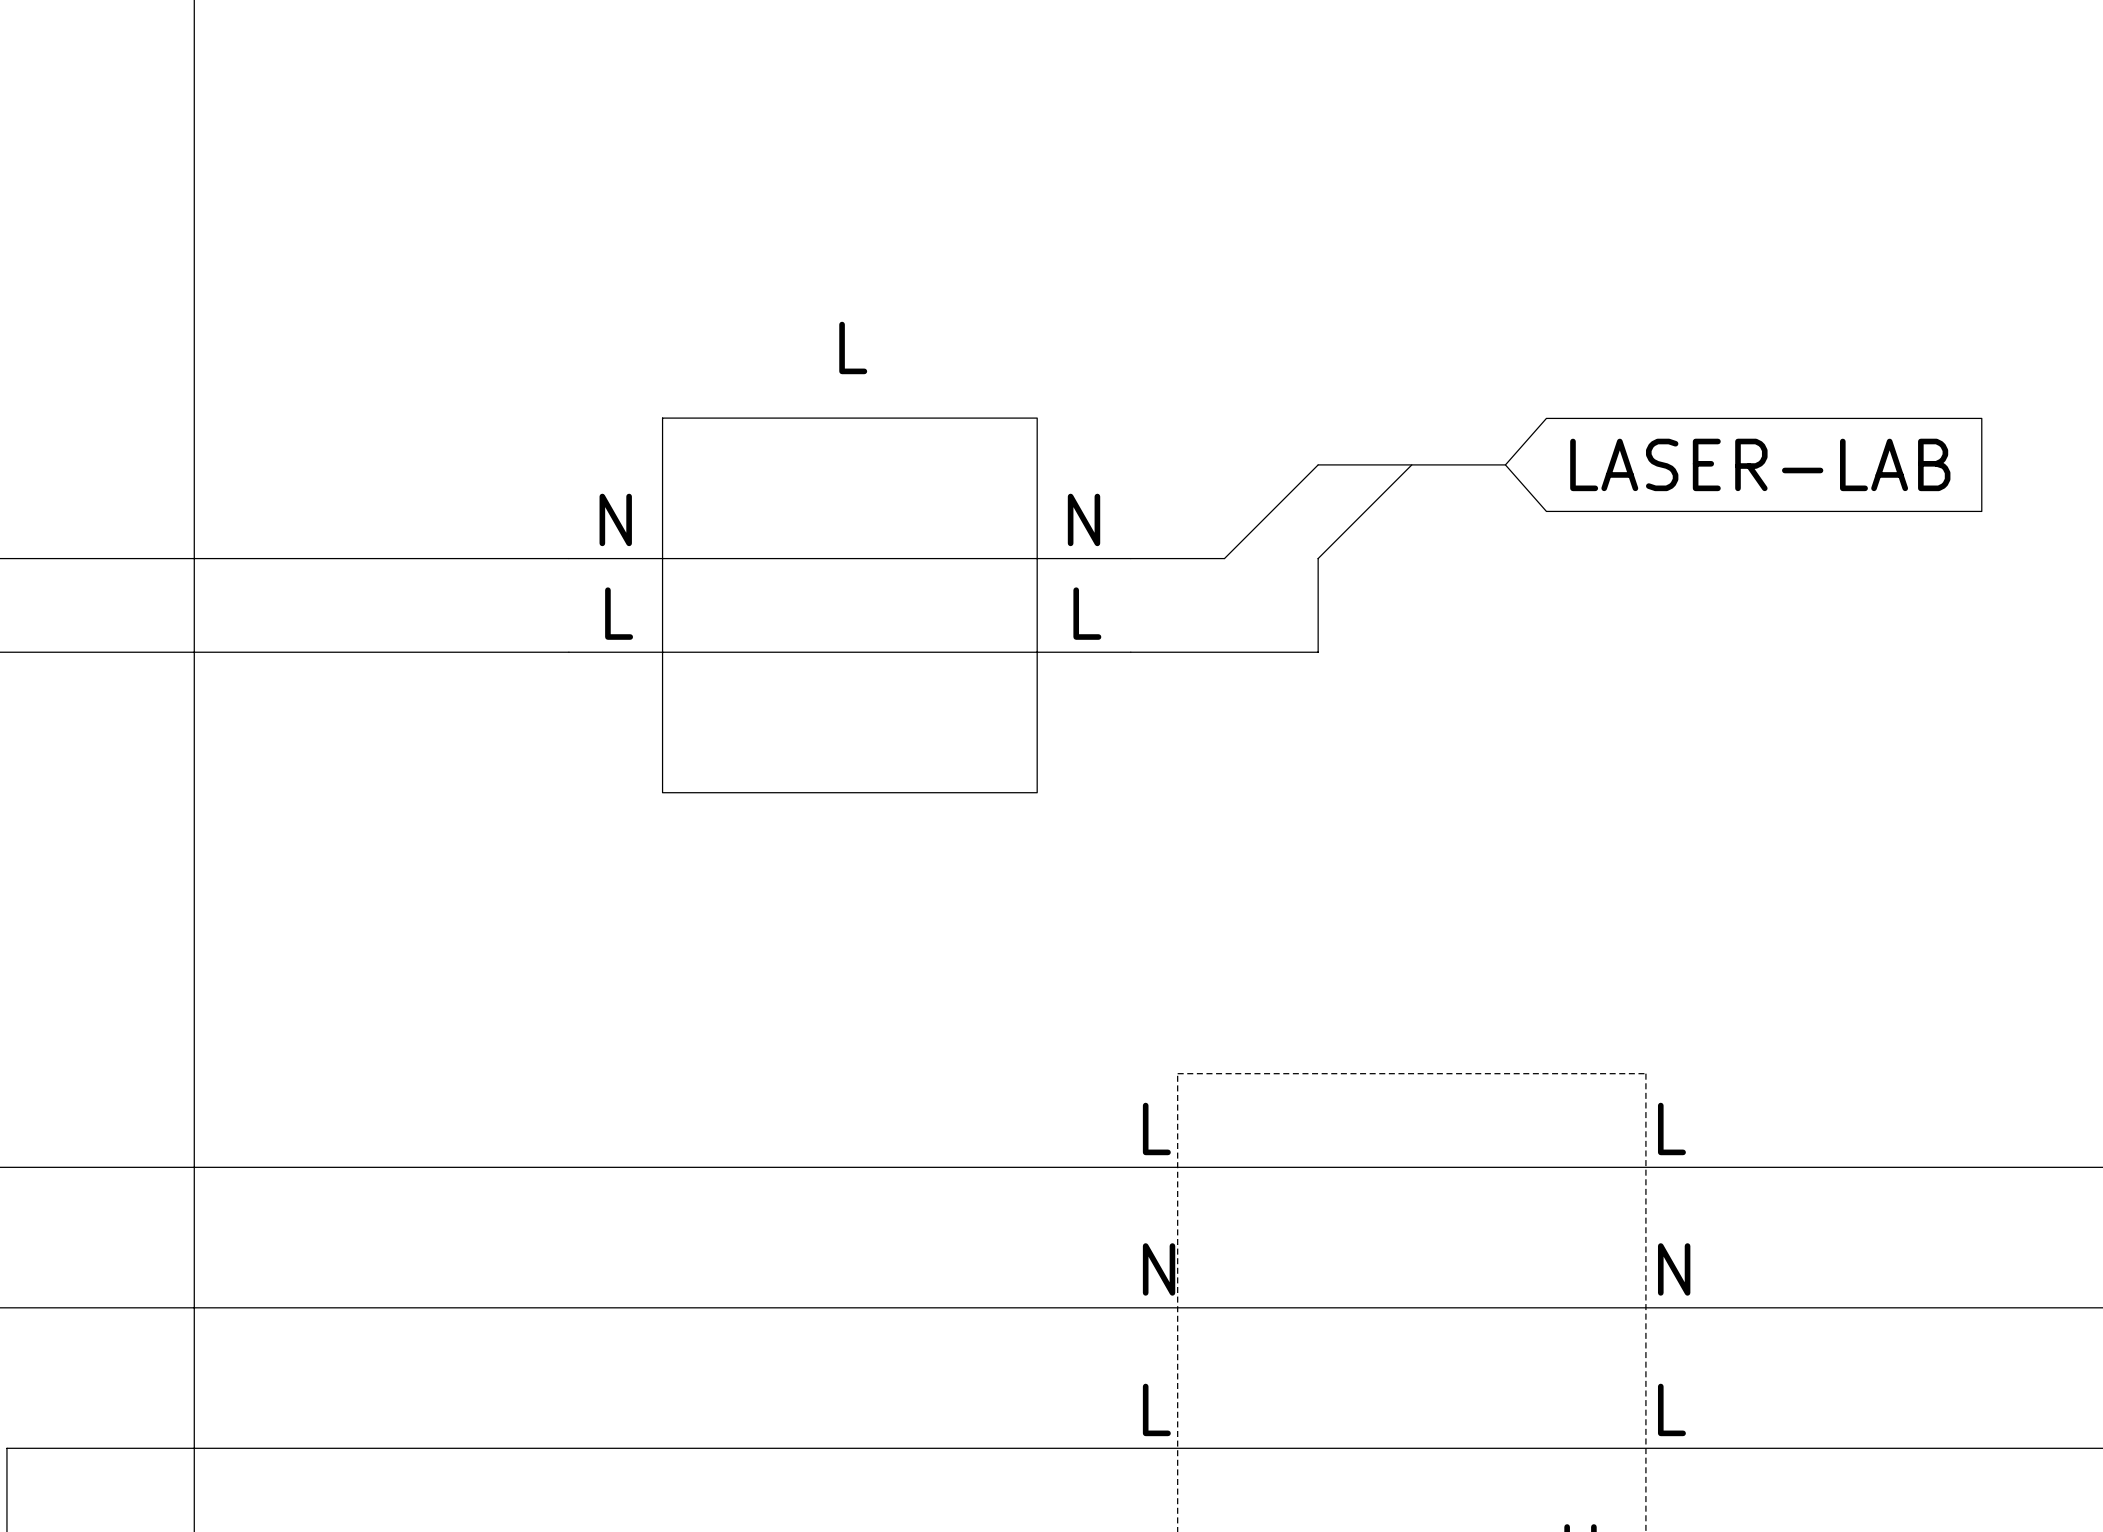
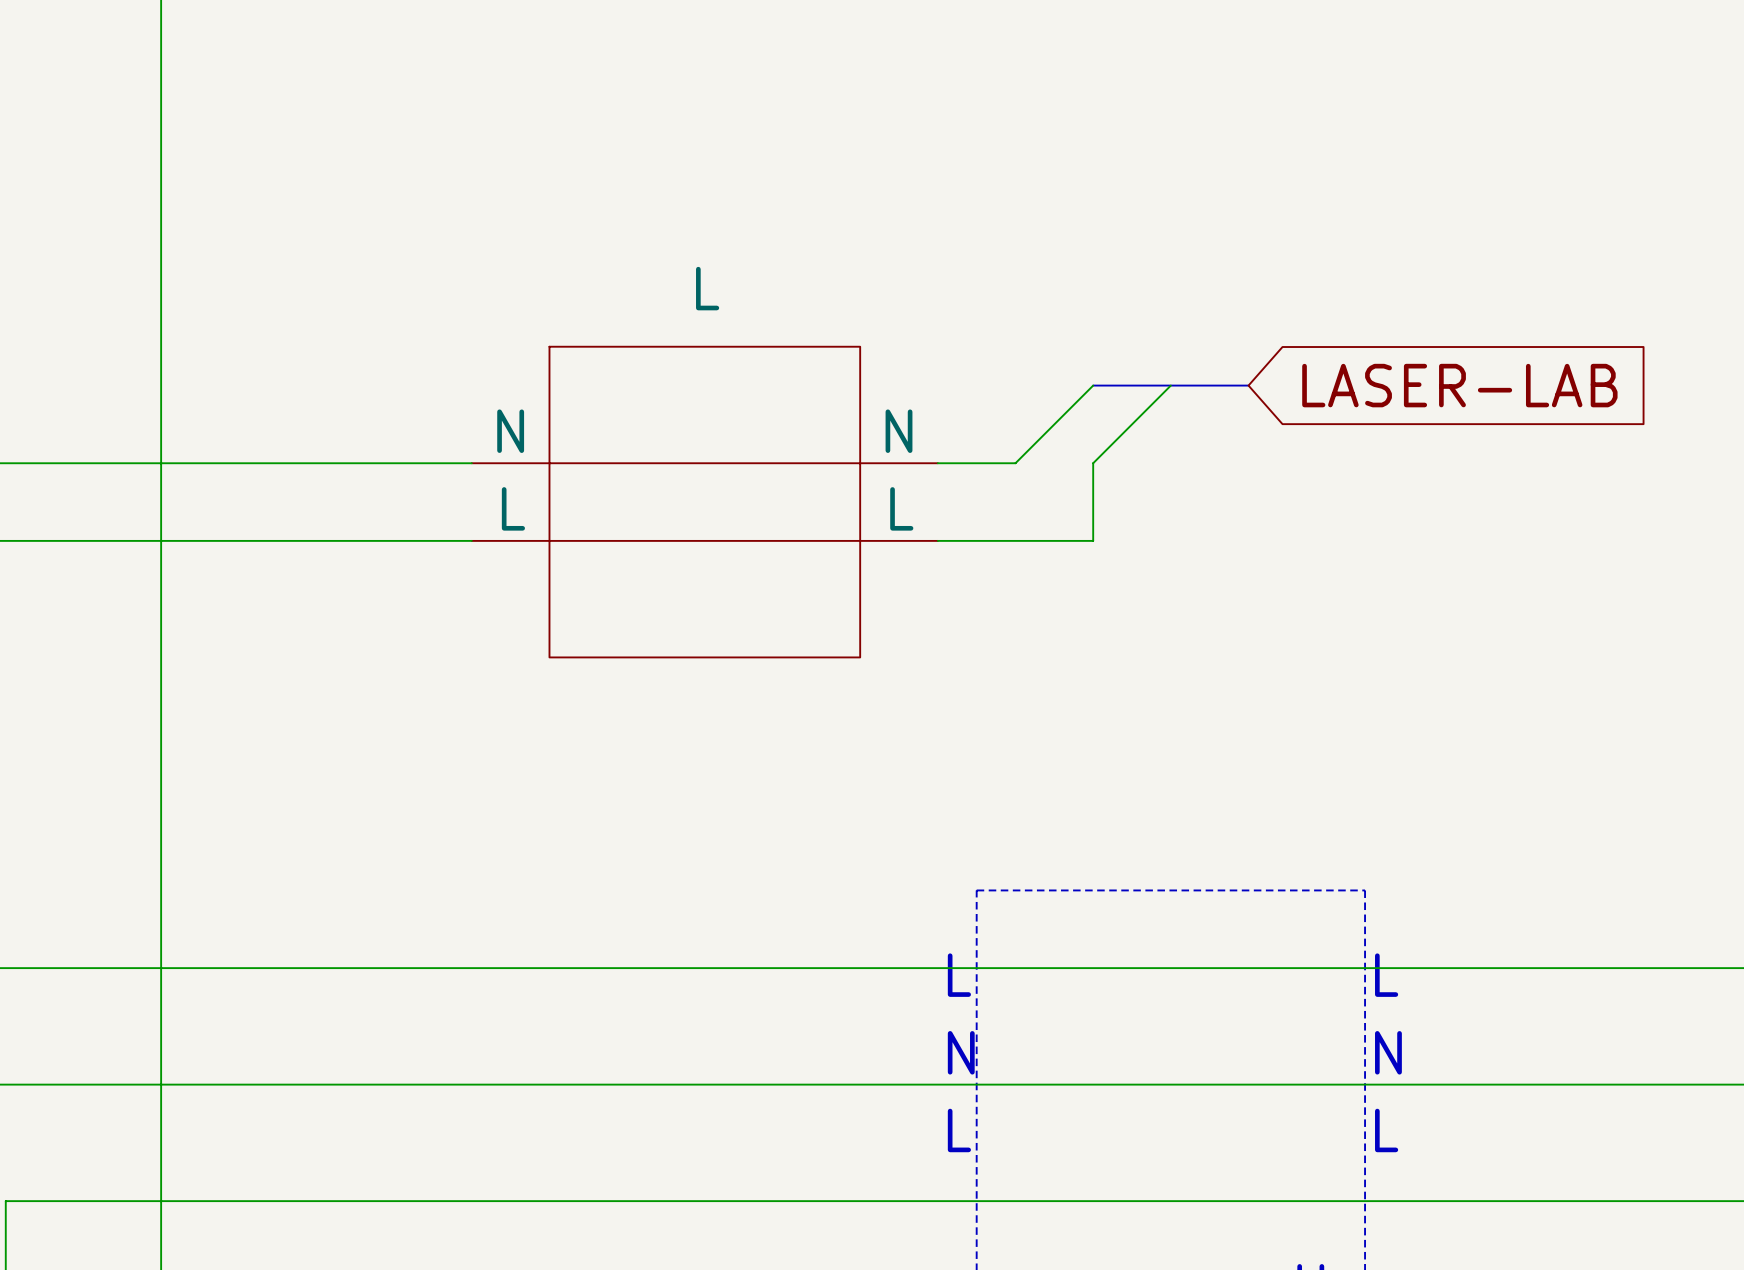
text position: L (1156, 1128) -> L (959, 975)
text position: L (1671, 1128) -> L (1386, 975)
text position: L (1156, 1409) -> L (959, 1130)
text position: L (1671, 1409) -> L (1386, 1130)

